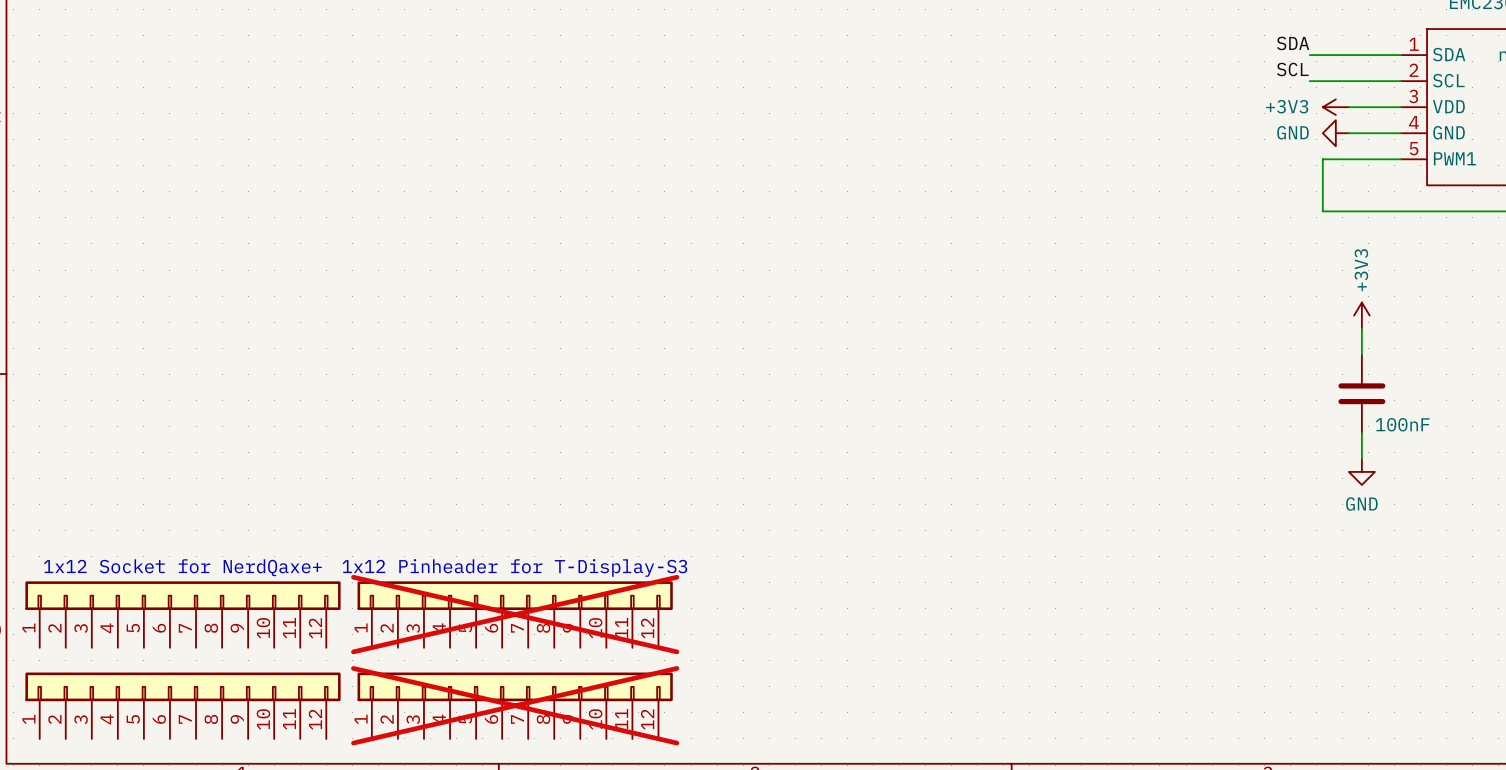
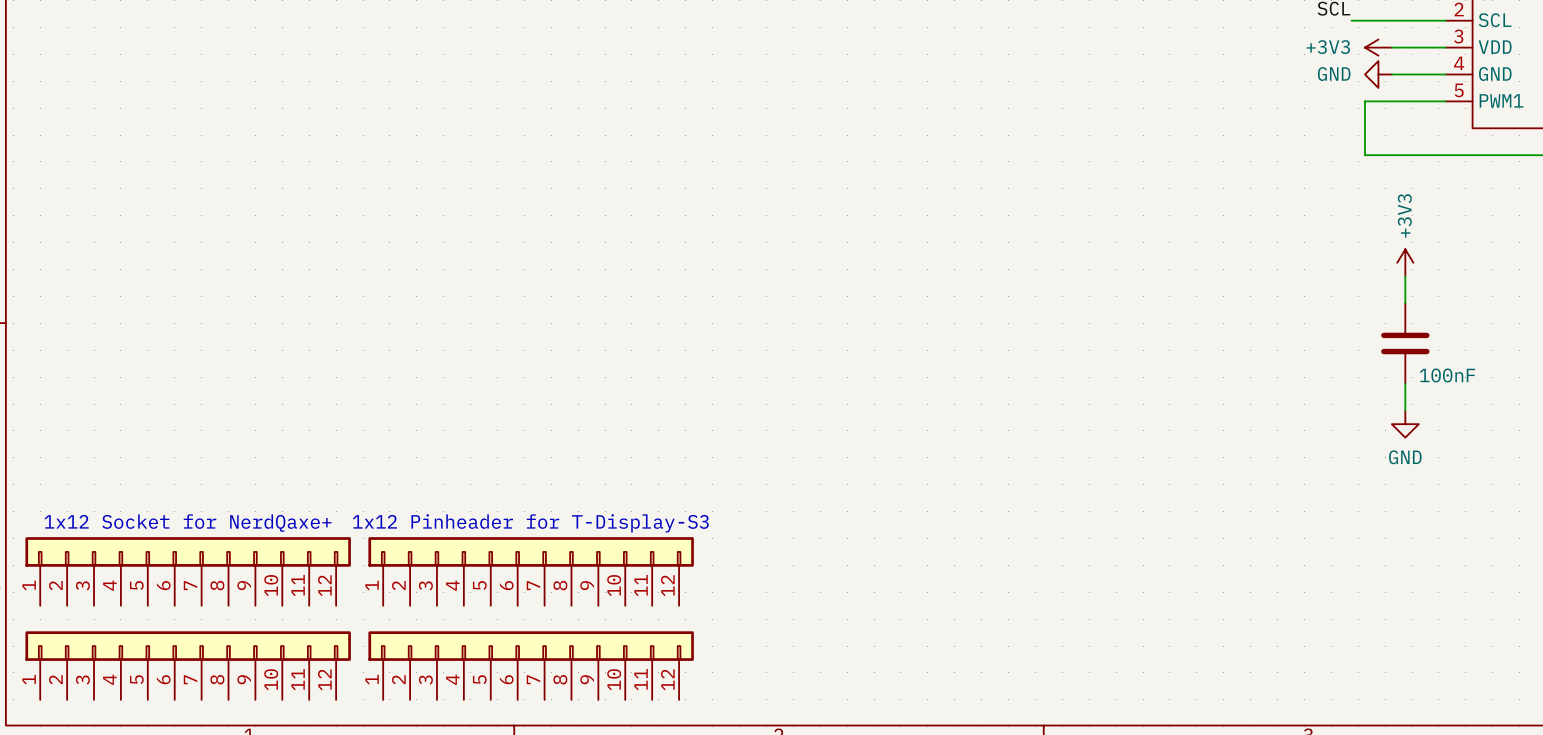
part do-not-place cross: (515, 614) -> none
part do-not-place cross: (515, 705) -> none

